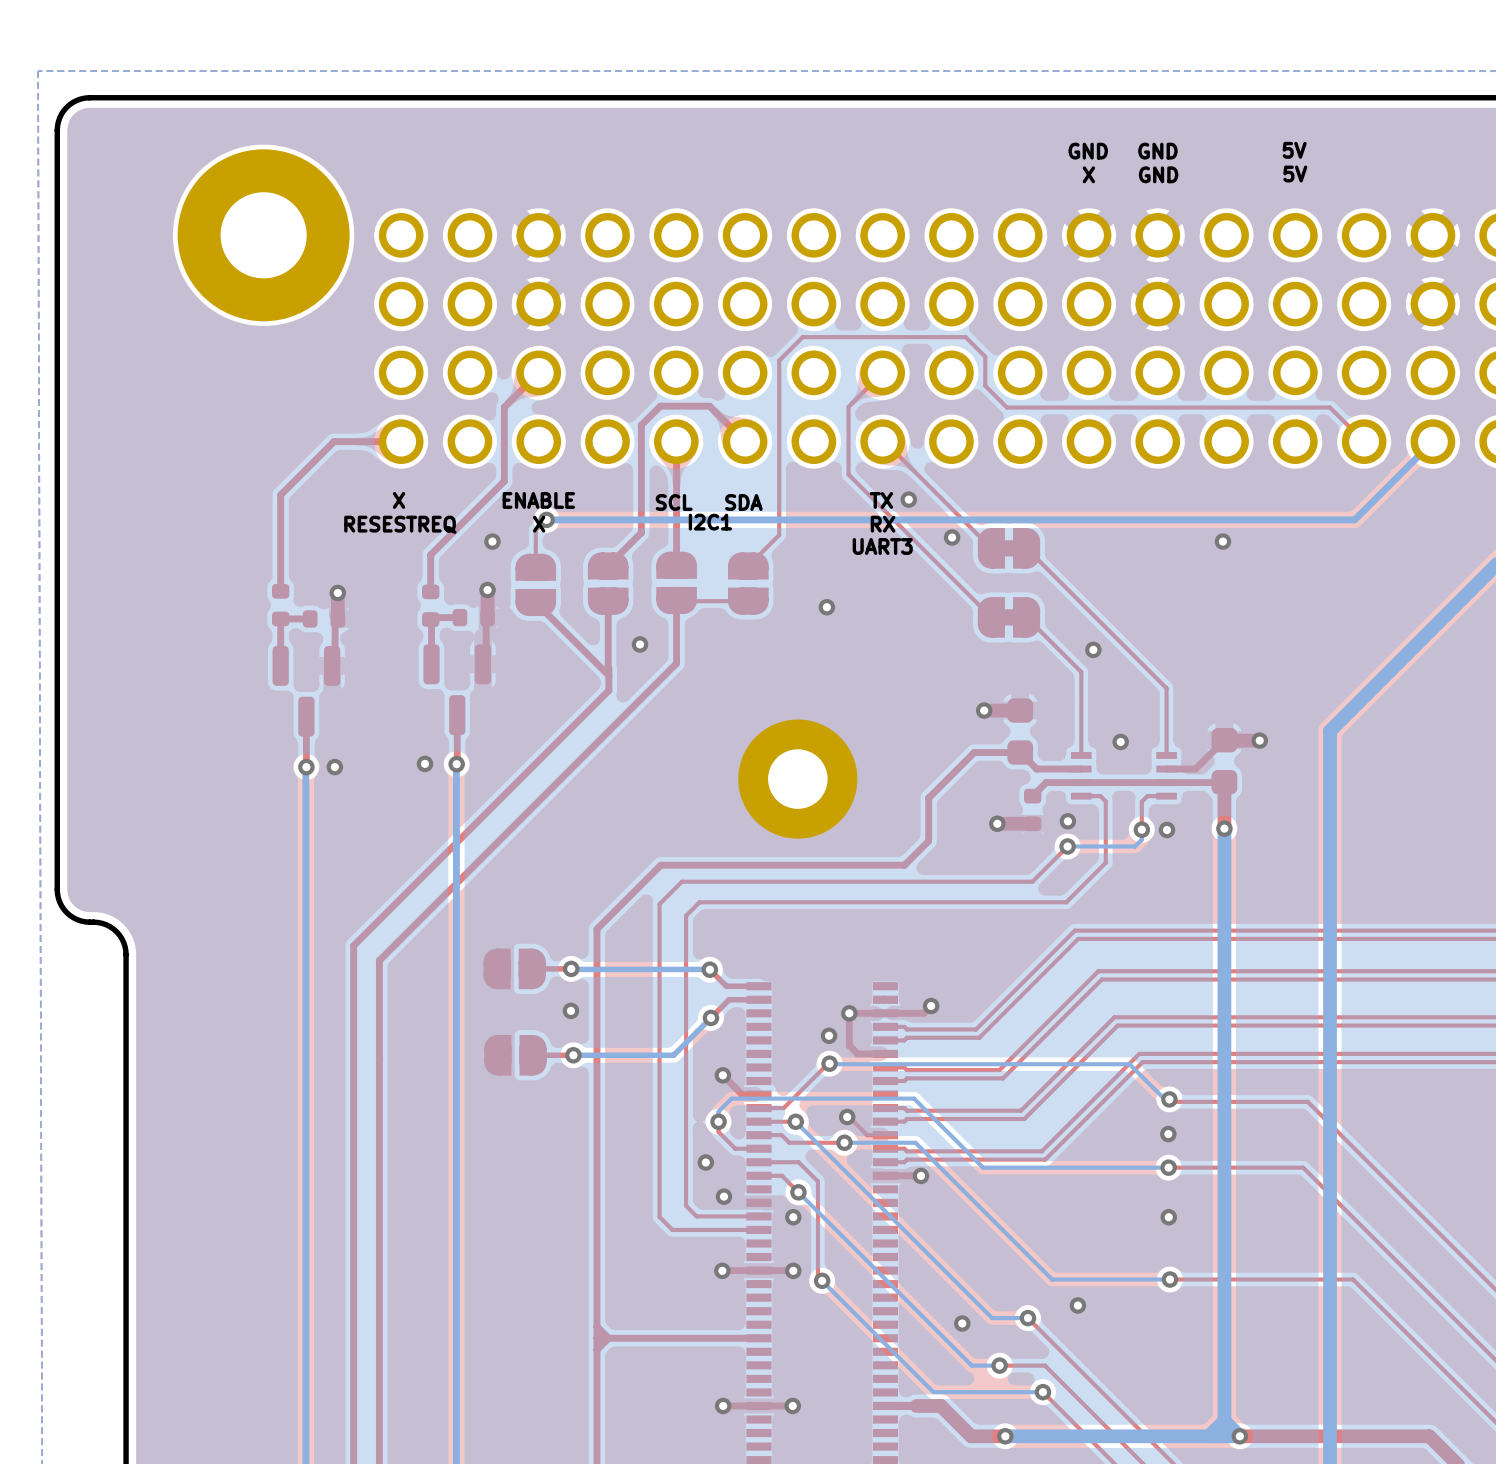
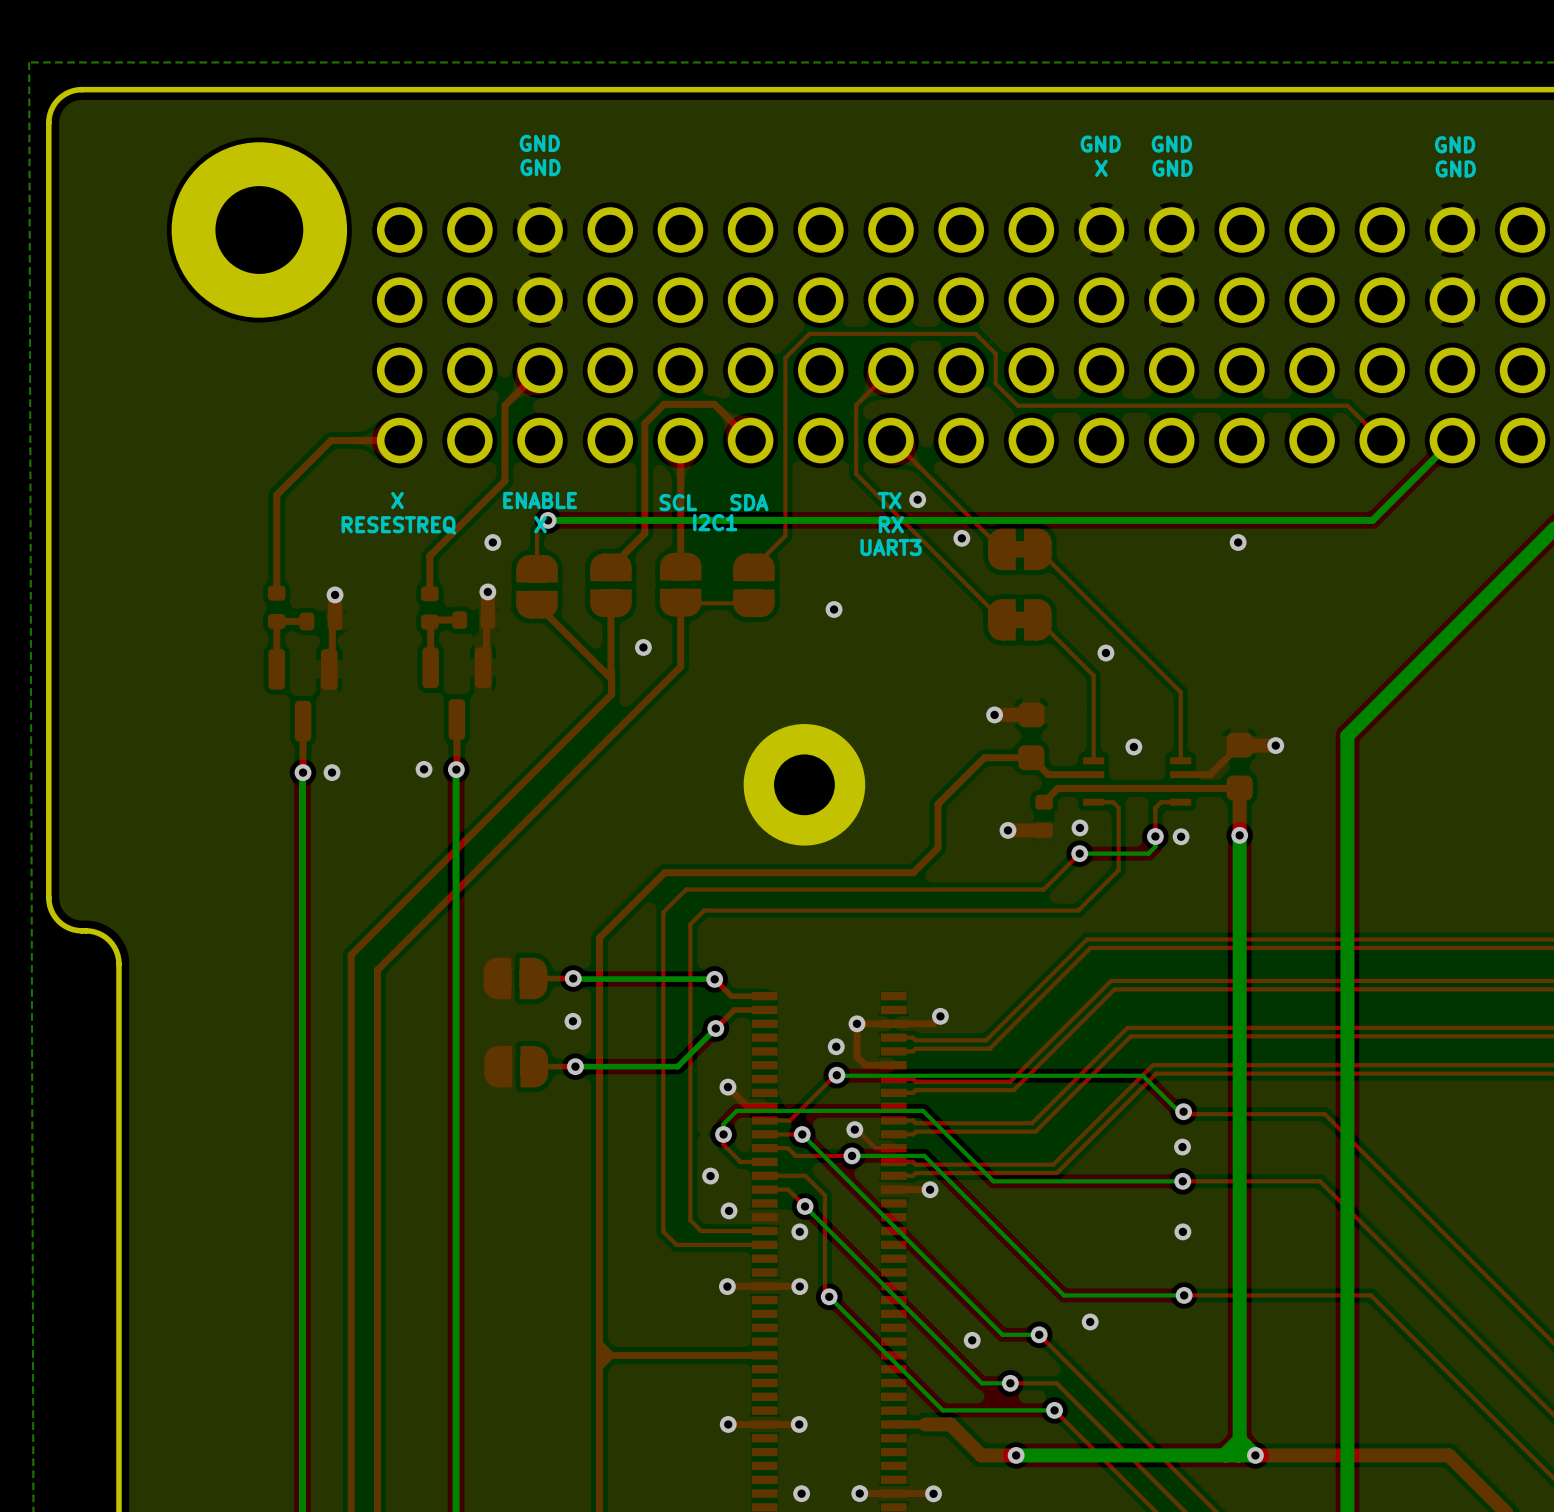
text: none -> GND (539, 143)
text: 5V (1294, 150) -> none
text: none -> GND (1455, 144)
text: none -> GND (540, 167)
text: 5V (1295, 174) -> none
text: none -> GND (1455, 168)

